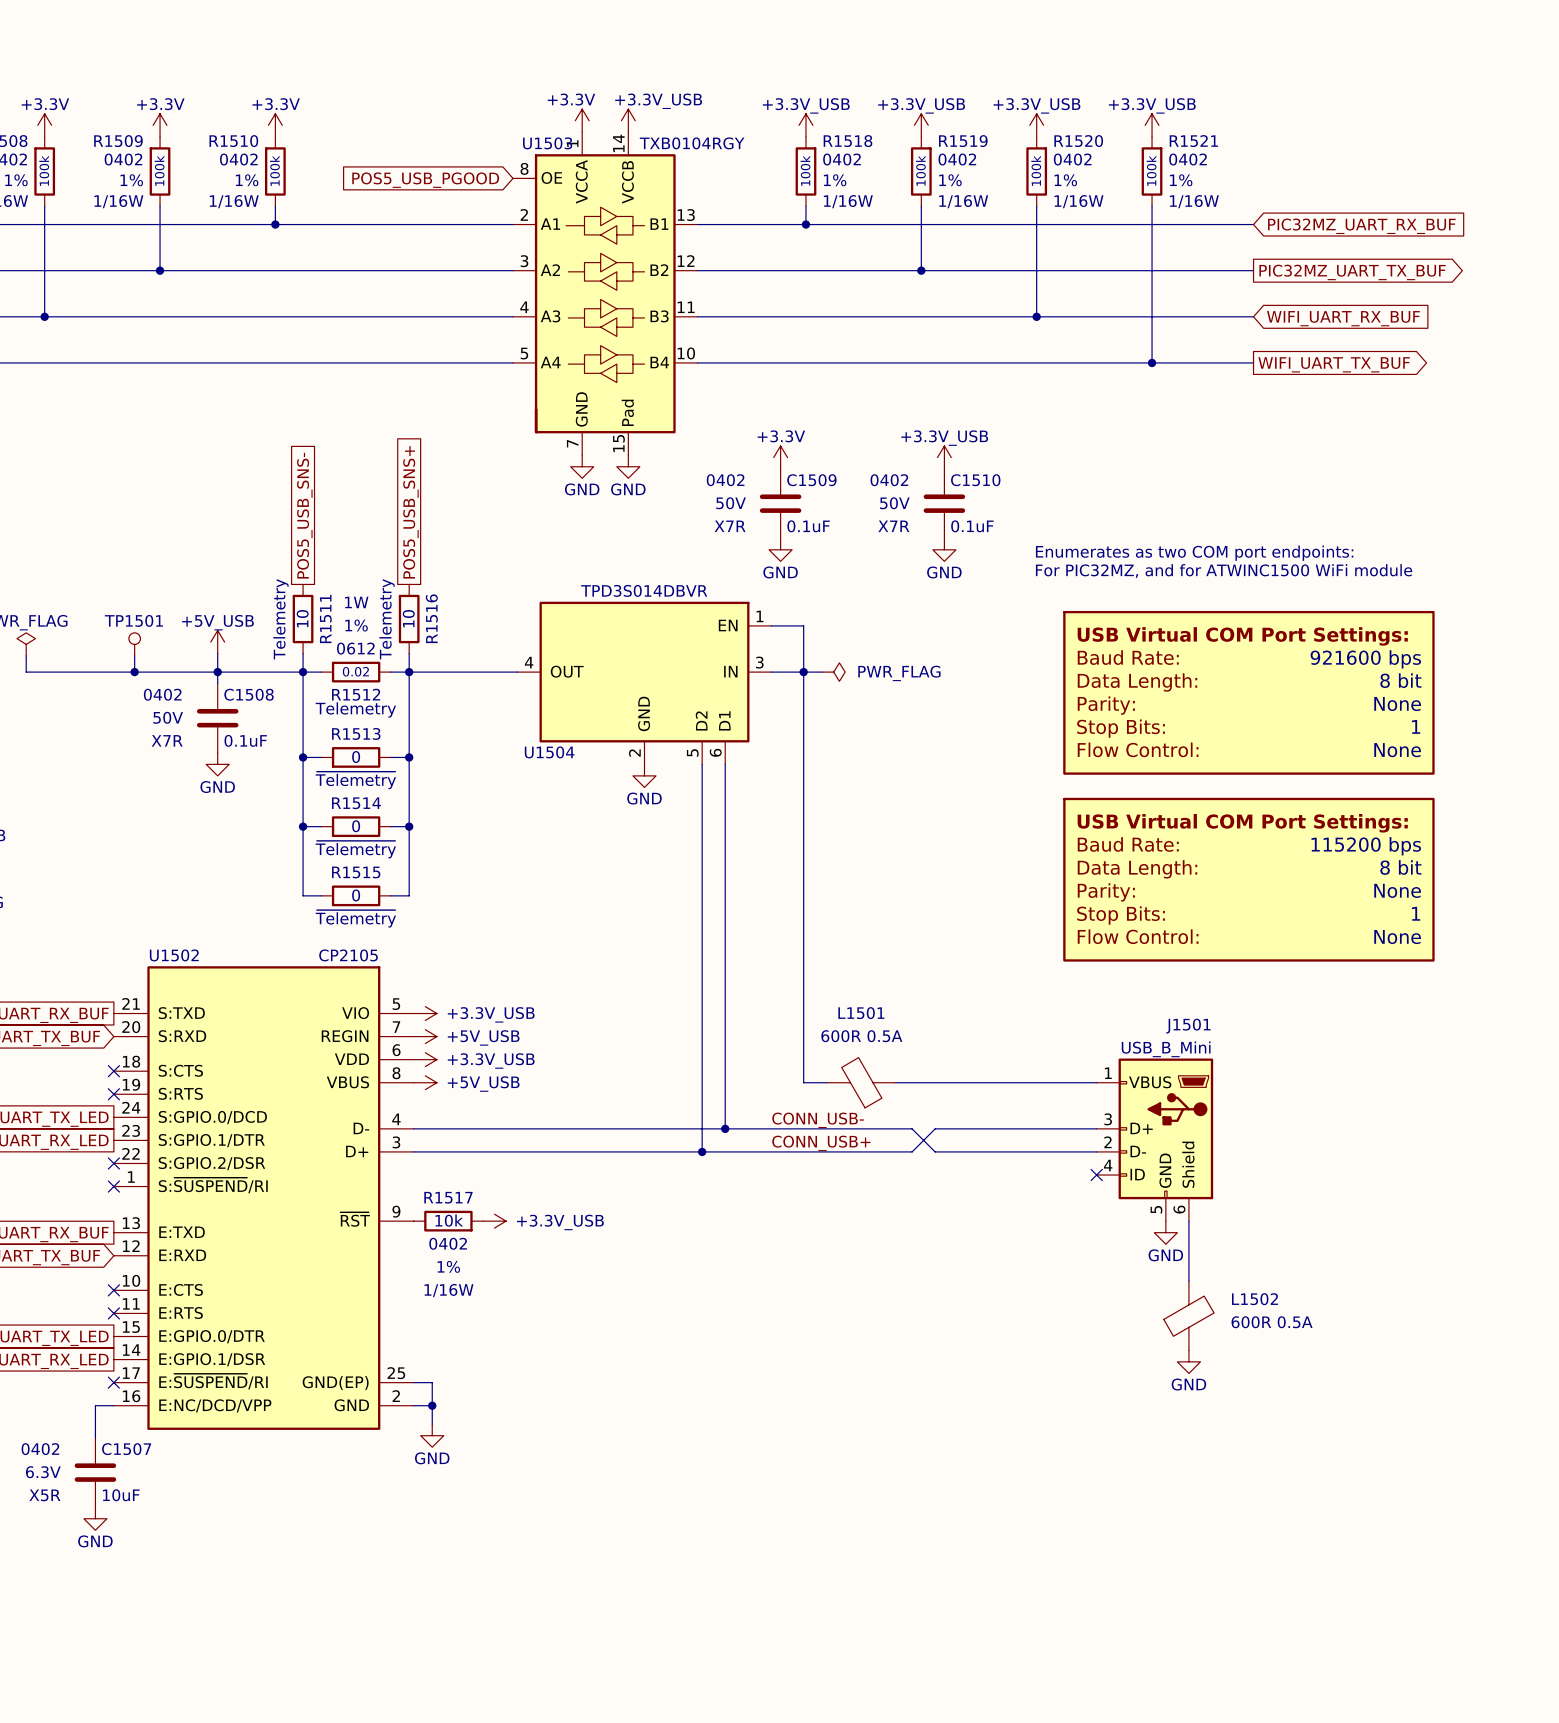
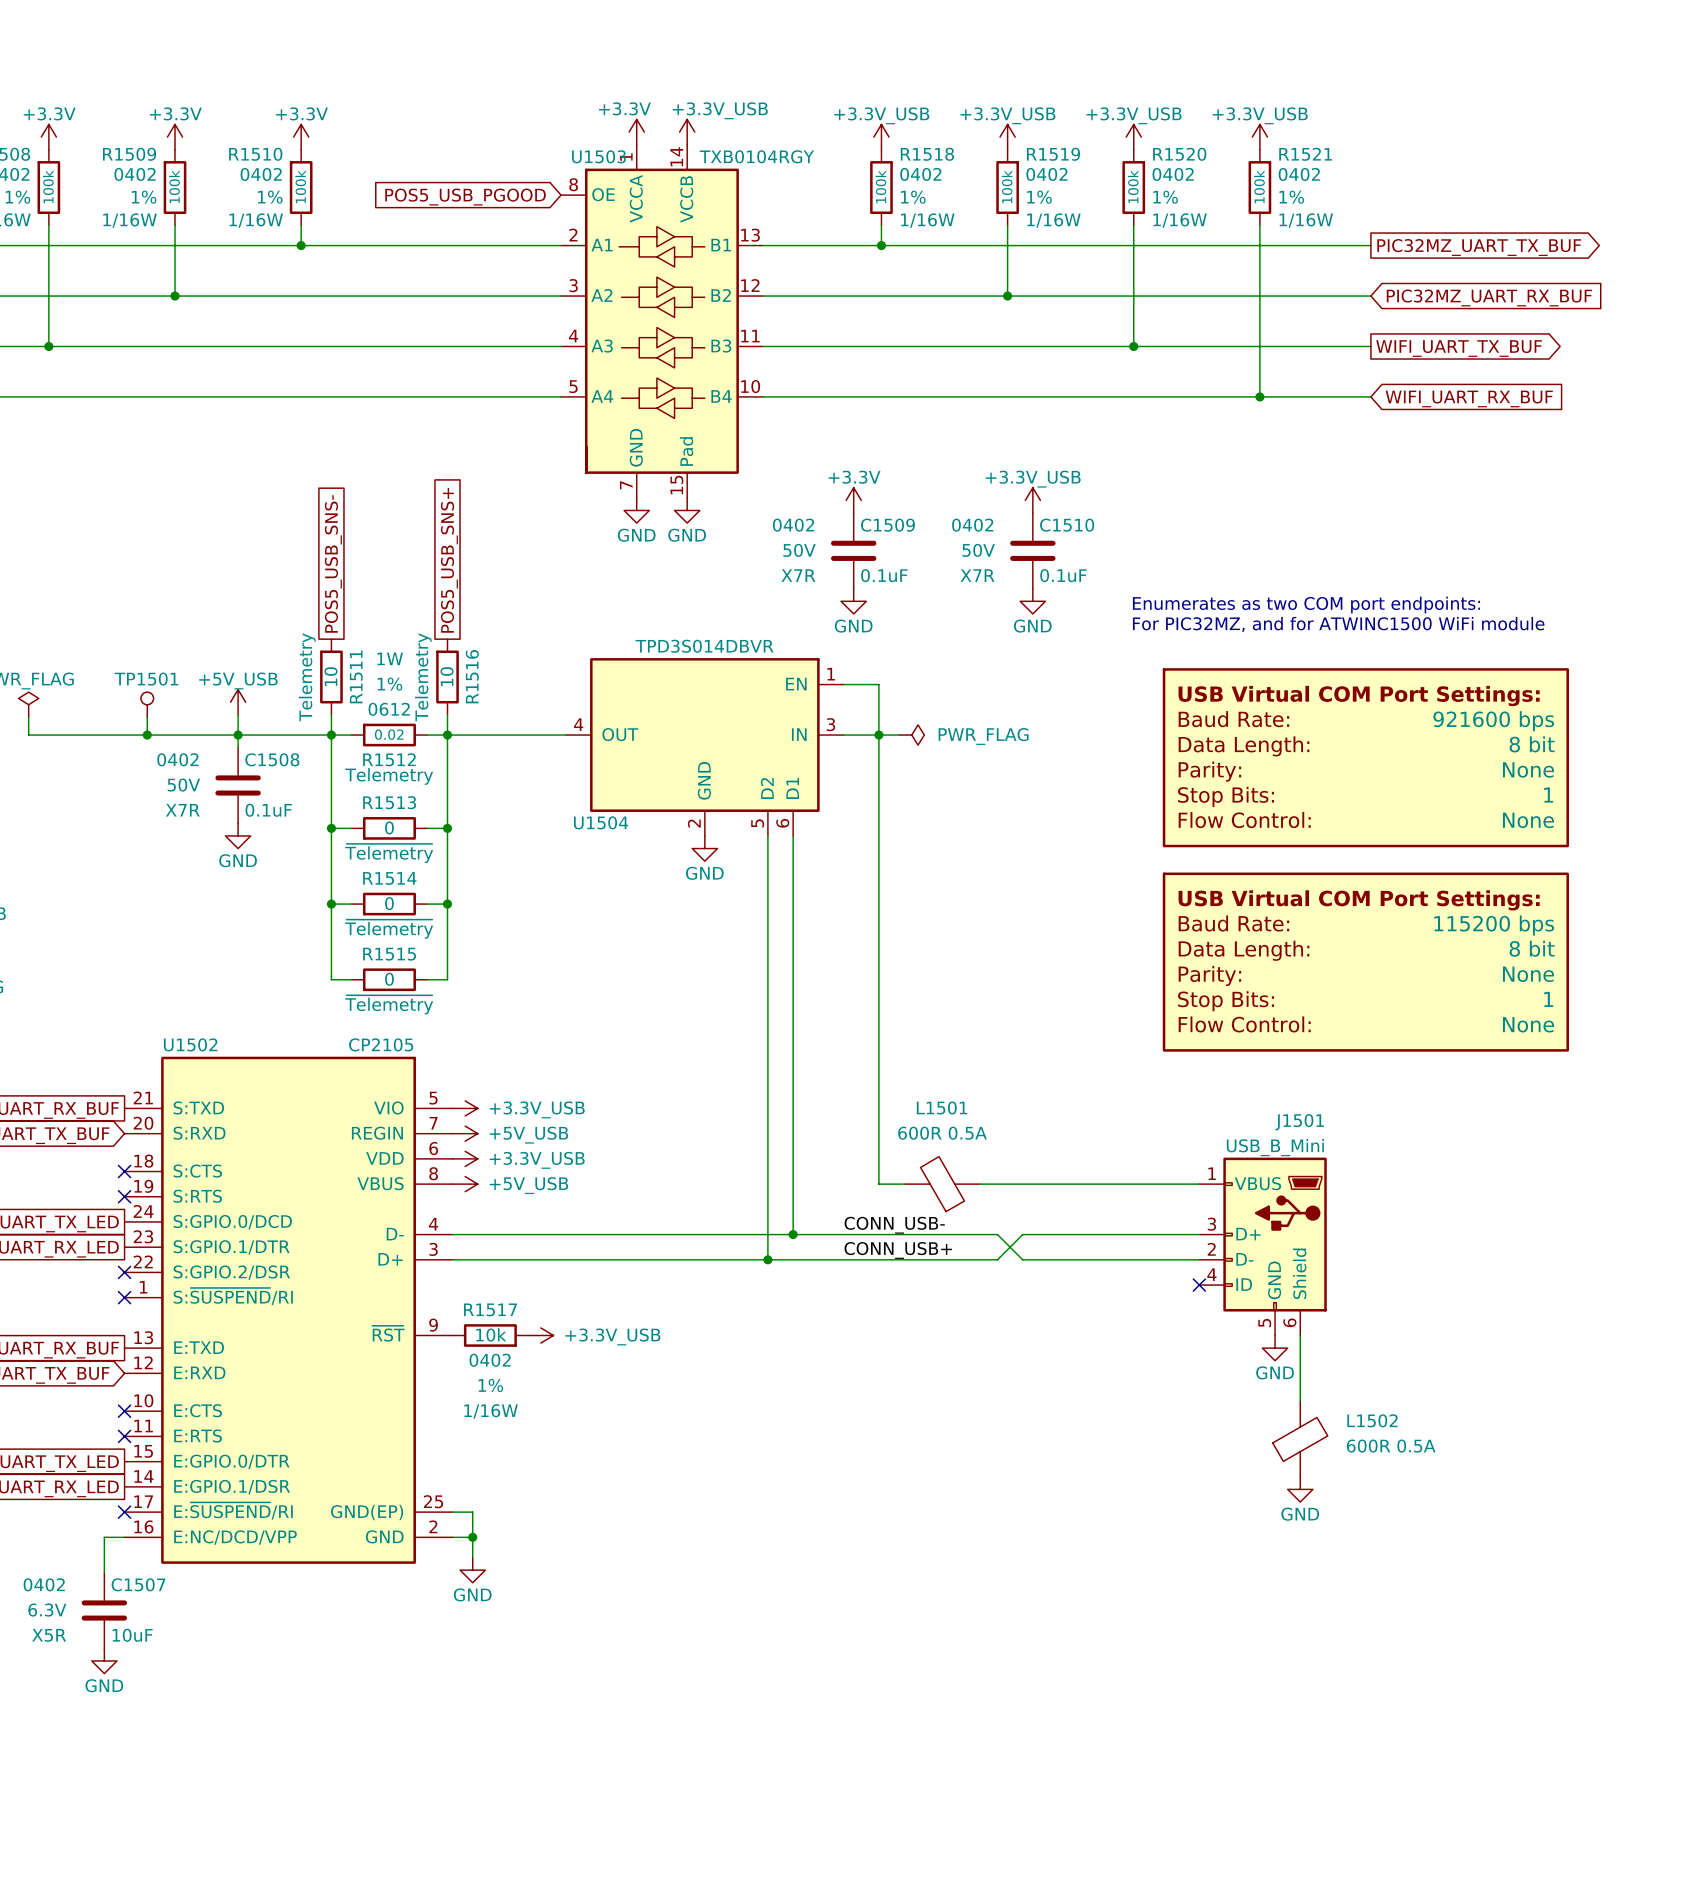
global label shape: input (1361, 226) -> output (1479, 247)
global label: PIC32MZ_UART_RX_BUF (1361, 226) -> PIC32MZ_UART_TX_BUF (1479, 247)
global label shape: output (1352, 272) -> input (1489, 297)
global label: PIC32MZ_UART_TX_BUF (1352, 272) -> PIC32MZ_UART_RX_BUF (1489, 297)
global label shape: input (1343, 318) -> output (1459, 348)
global label: WIFI_UART_RX_BUF (1343, 318) -> WIFI_UART_TX_BUF (1459, 348)
global label shape: output (1334, 364) -> input (1469, 398)
global label: WIFI_UART_TX_BUF (1334, 364) -> WIFI_UART_RX_BUF (1469, 398)

